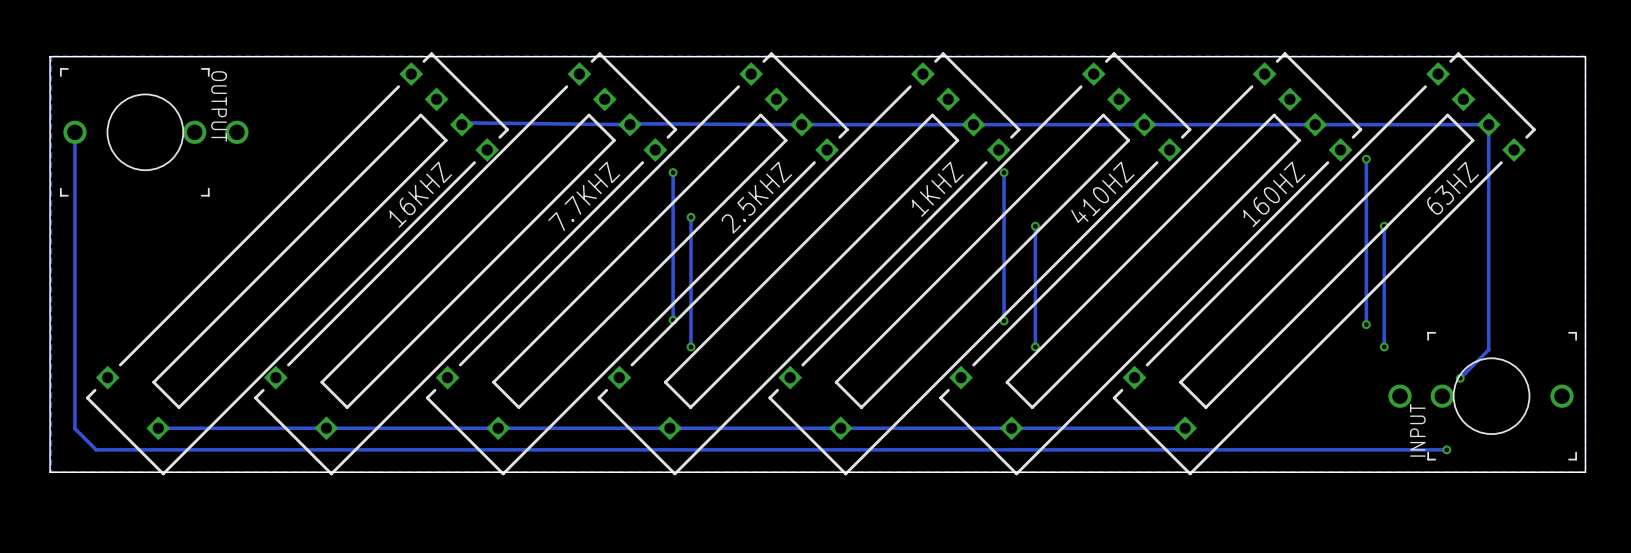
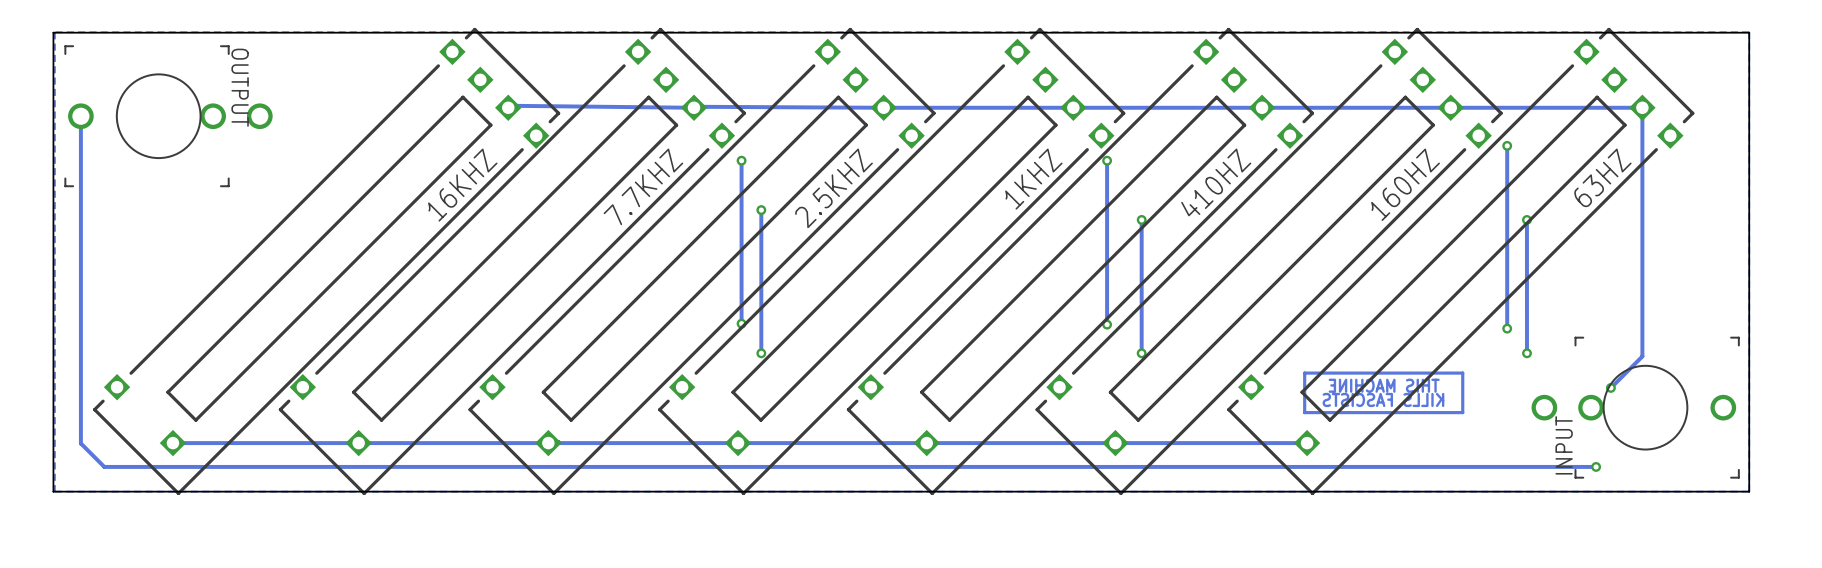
drawing: none -> [1303, 371, 1465, 415]

